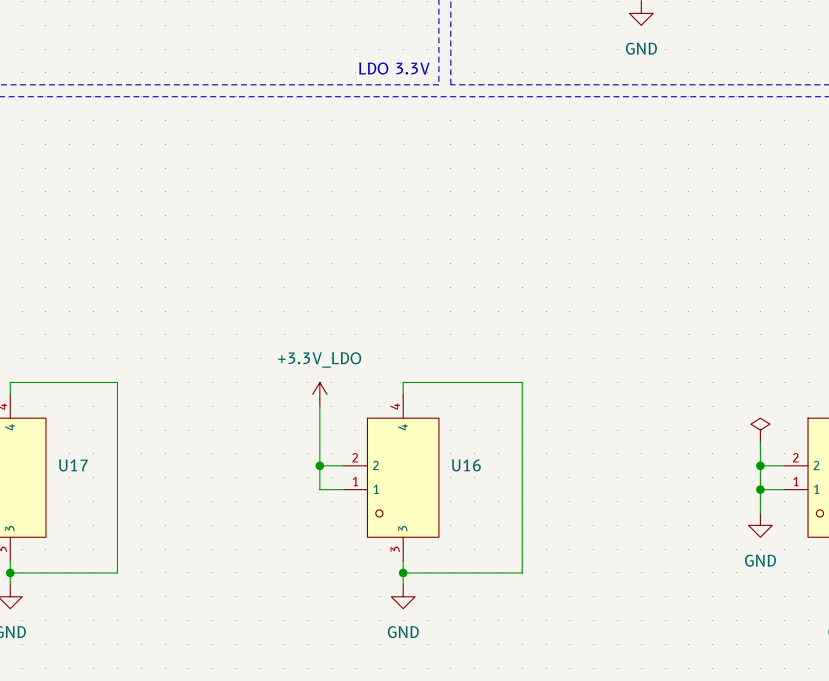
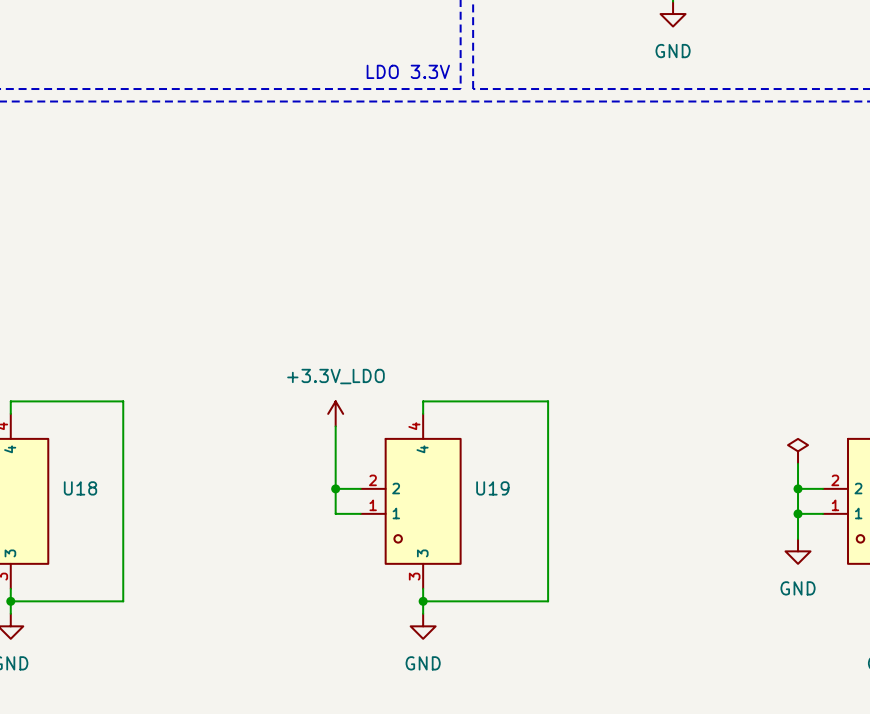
U17 name: U17 (73, 465) -> U18 (80, 488)
U16 name: U16 (466, 465) -> U19 (492, 488)

